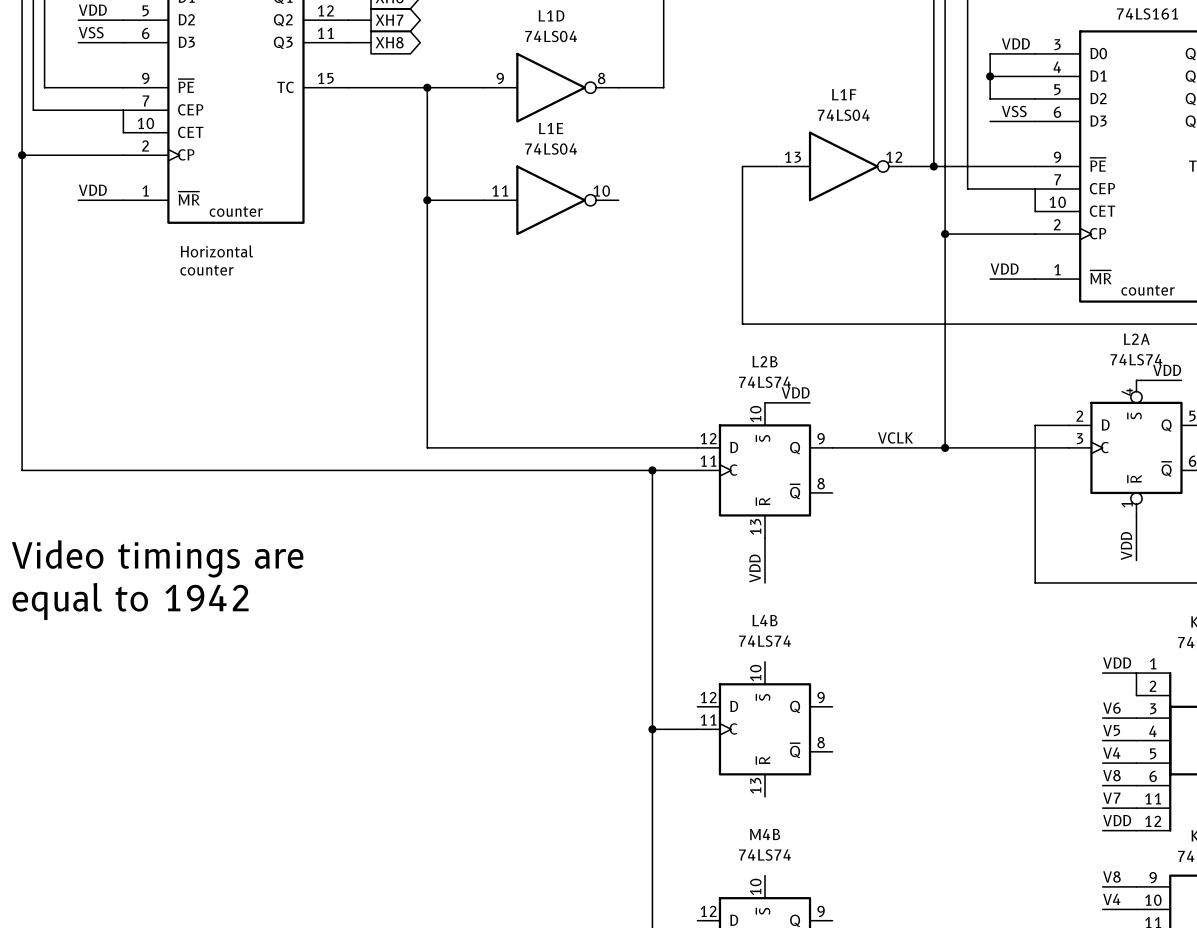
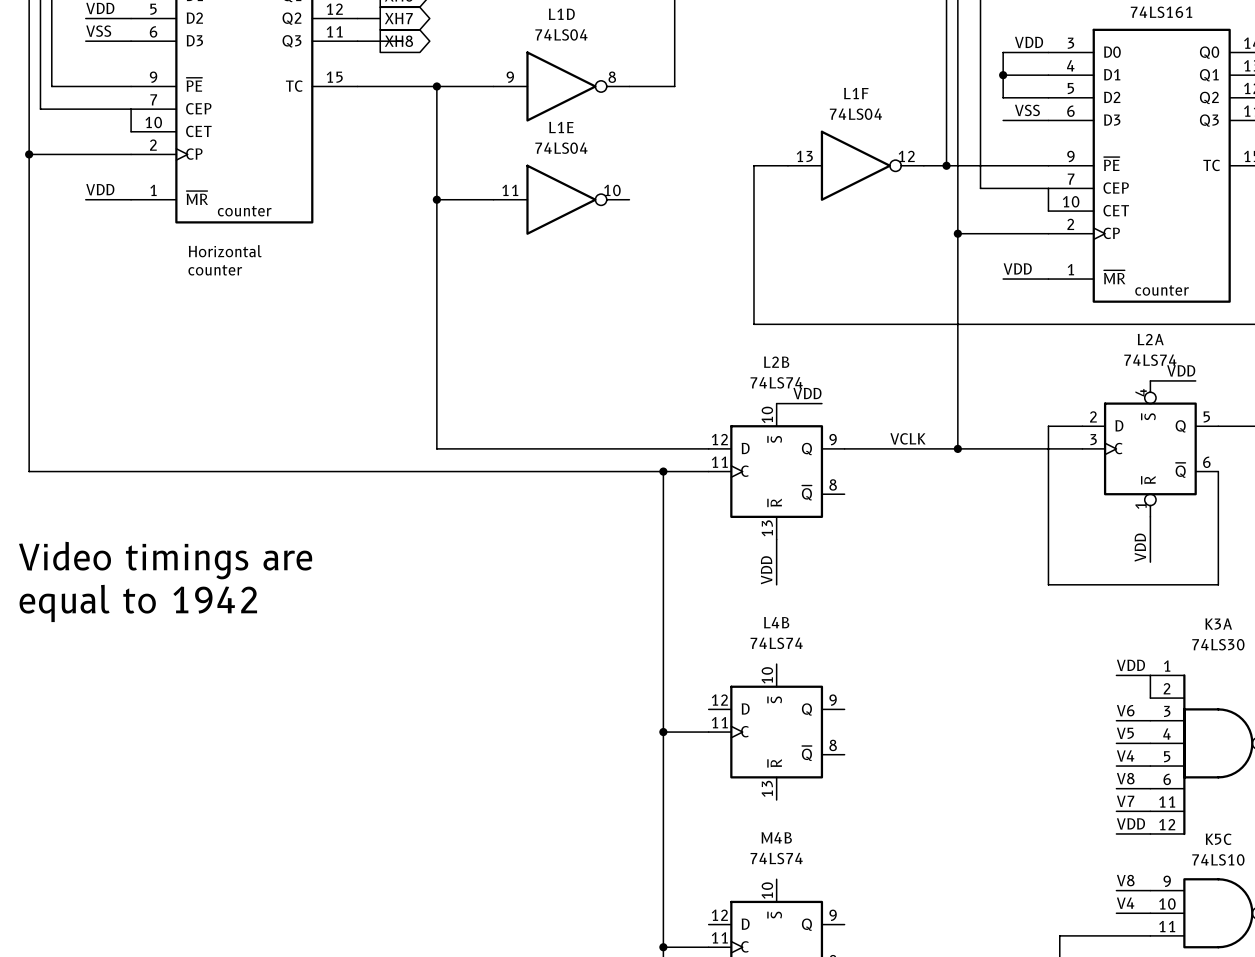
wire: none -> (380, 41) (402, 41)

